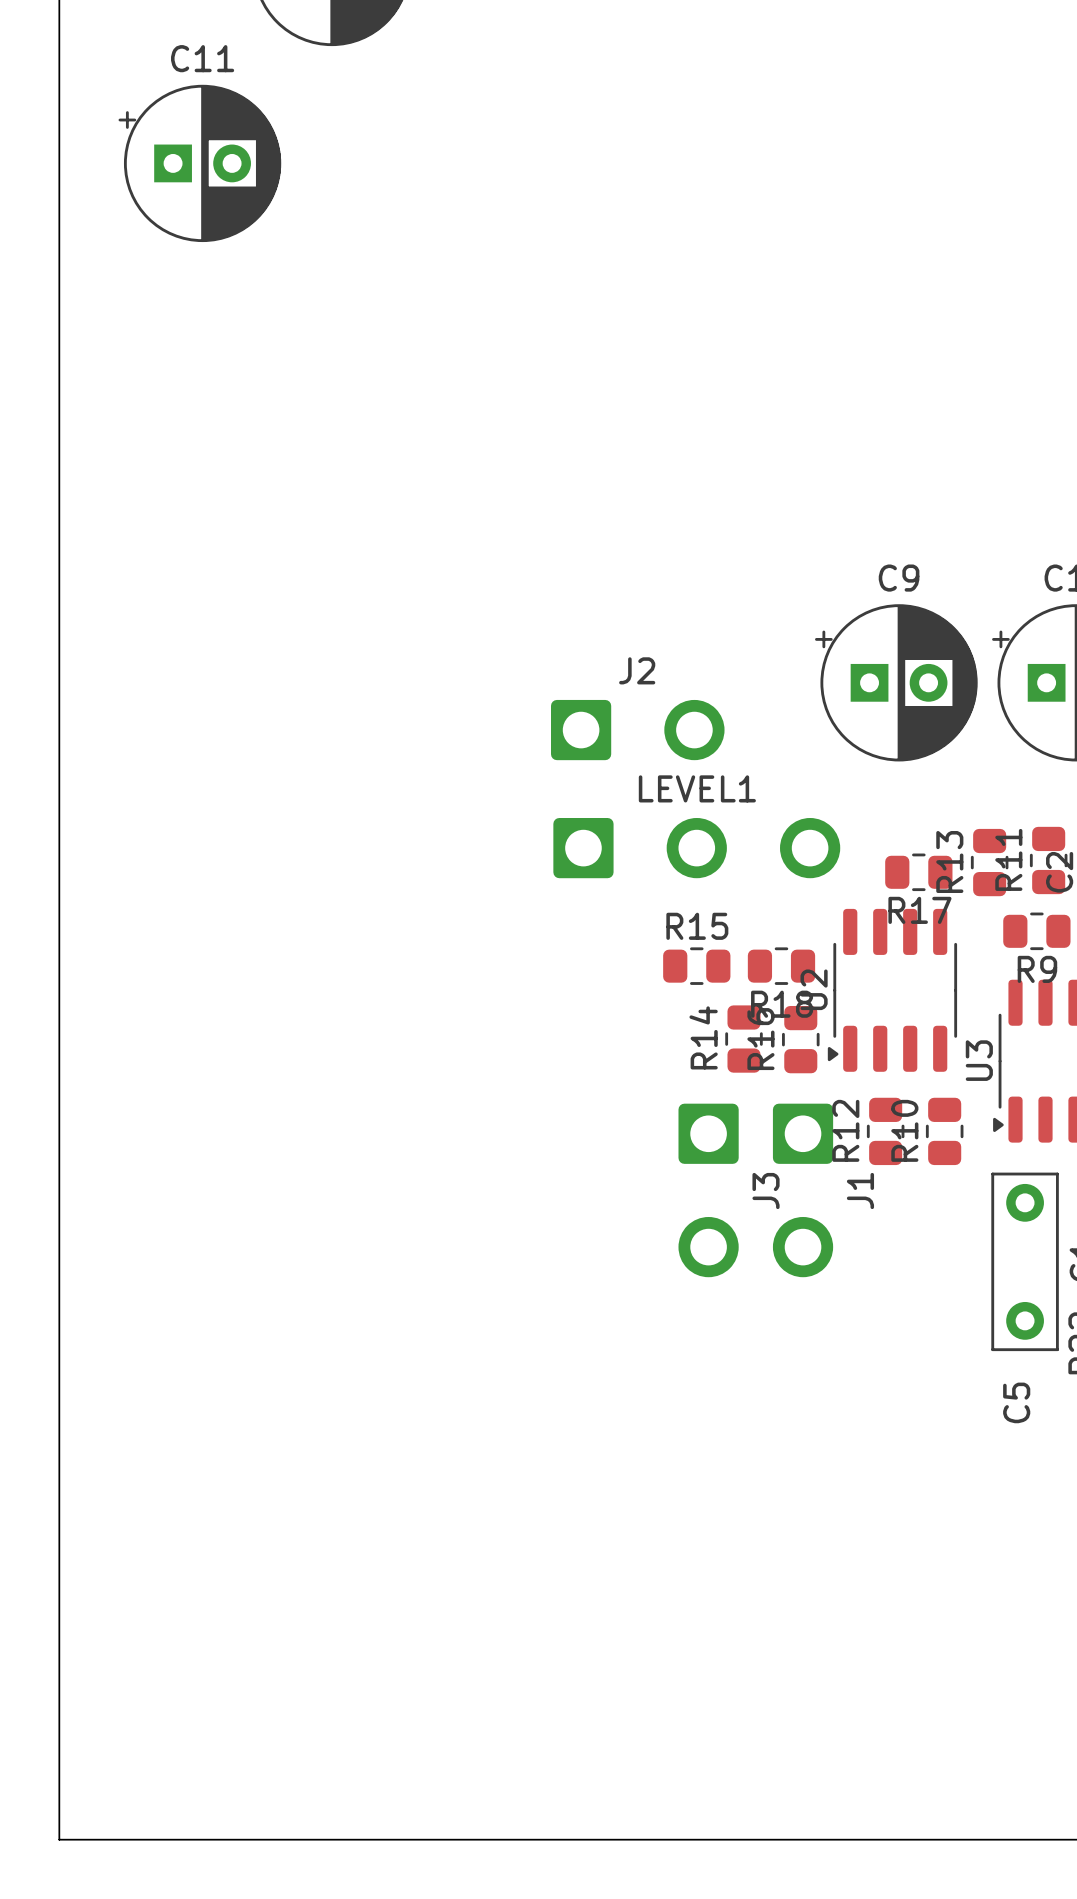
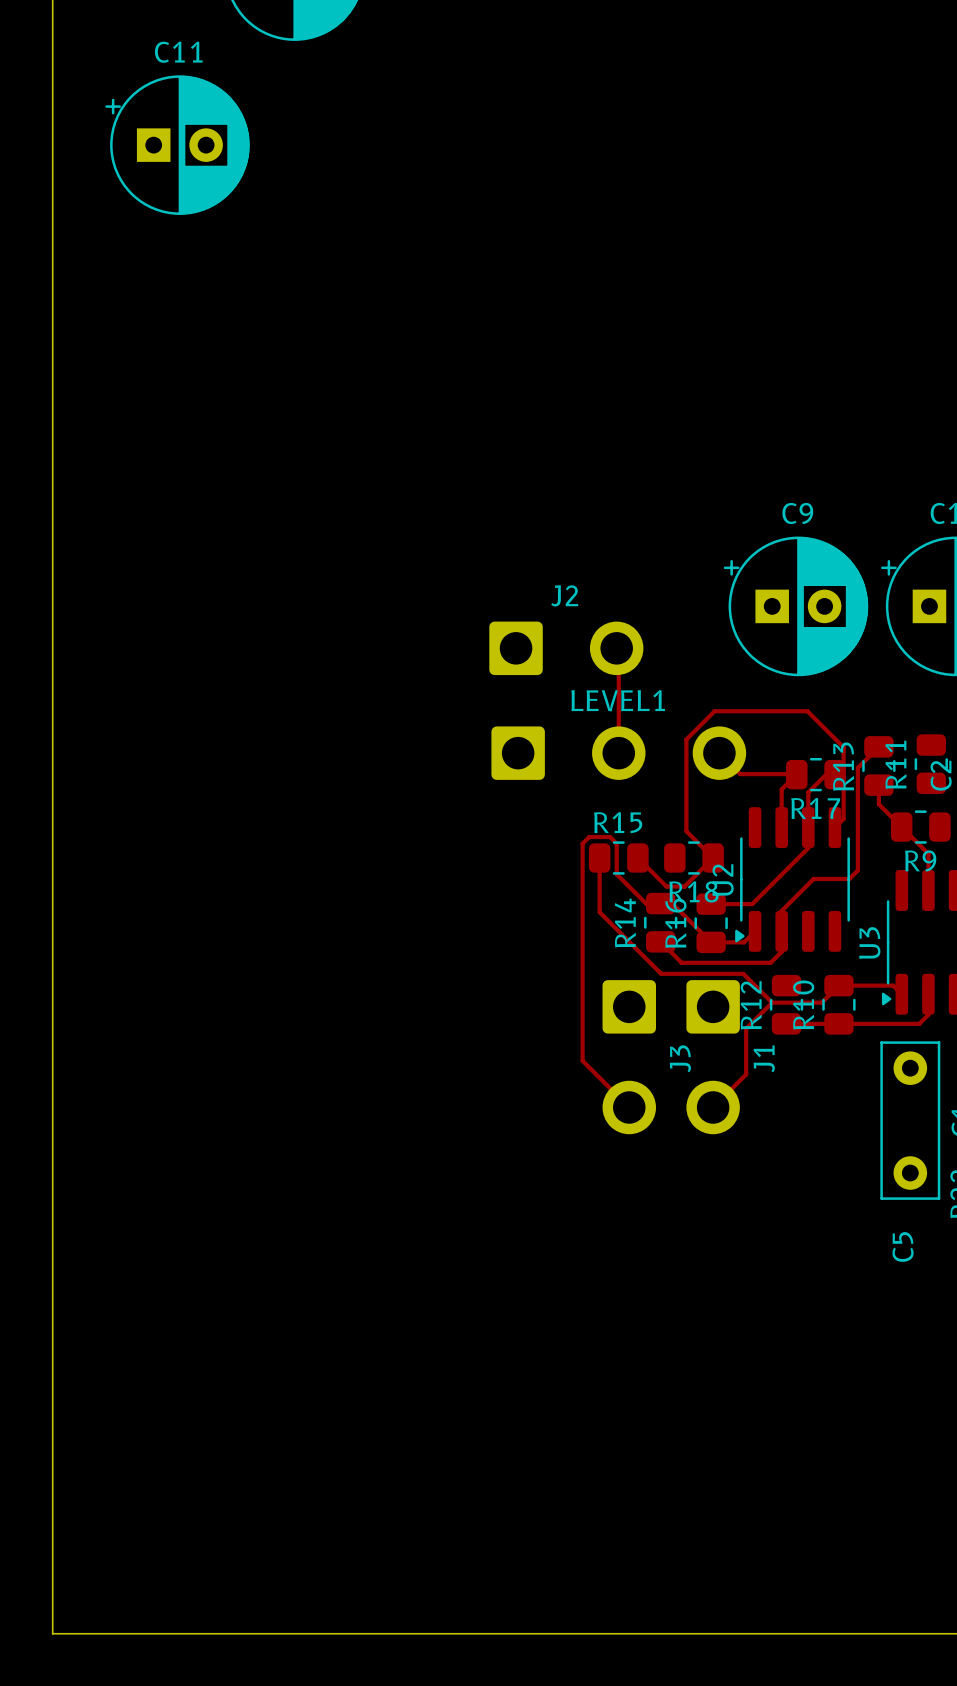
track: none -> (616, 648) (618, 650) (618, 753)
track: none -> (878, 746) (857, 767) (857, 870) (849, 878) (813, 878) (781, 910) (781, 951) (770, 962) (681, 962) (660, 941)
track: none -> (719, 753) (740, 774) (788, 774) (788, 782) (781, 789) (781, 827)
track: none -> (826, 774) (808, 792) (808, 848) (752, 904) (711, 904)
track: none -> (878, 785) (878, 804) (928, 853) (928, 890)
track: none -> (834, 827) (843, 818) (843, 747) (807, 711) (714, 711) (686, 739) (686, 831) (713, 857) (684, 886) (666, 886) (637, 857)
track: none -> (599, 857) (599, 912) (661, 973) (743, 973) (772, 1002)
track: none -> (755, 931) (744, 942) (711, 942) (672, 903) (646, 903) (616, 874) (616, 843) (610, 837) (589, 837) (582, 843) (582, 1060) (629, 1107)
track: none -> (901, 994) (893, 985) (838, 985) (821, 1002) (772, 1002)
track: none -> (928, 994) (928, 1014) (919, 1023) (786, 1023)
track: none -> (772, 1002) (746, 1028) (746, 1074) (713, 1107)

